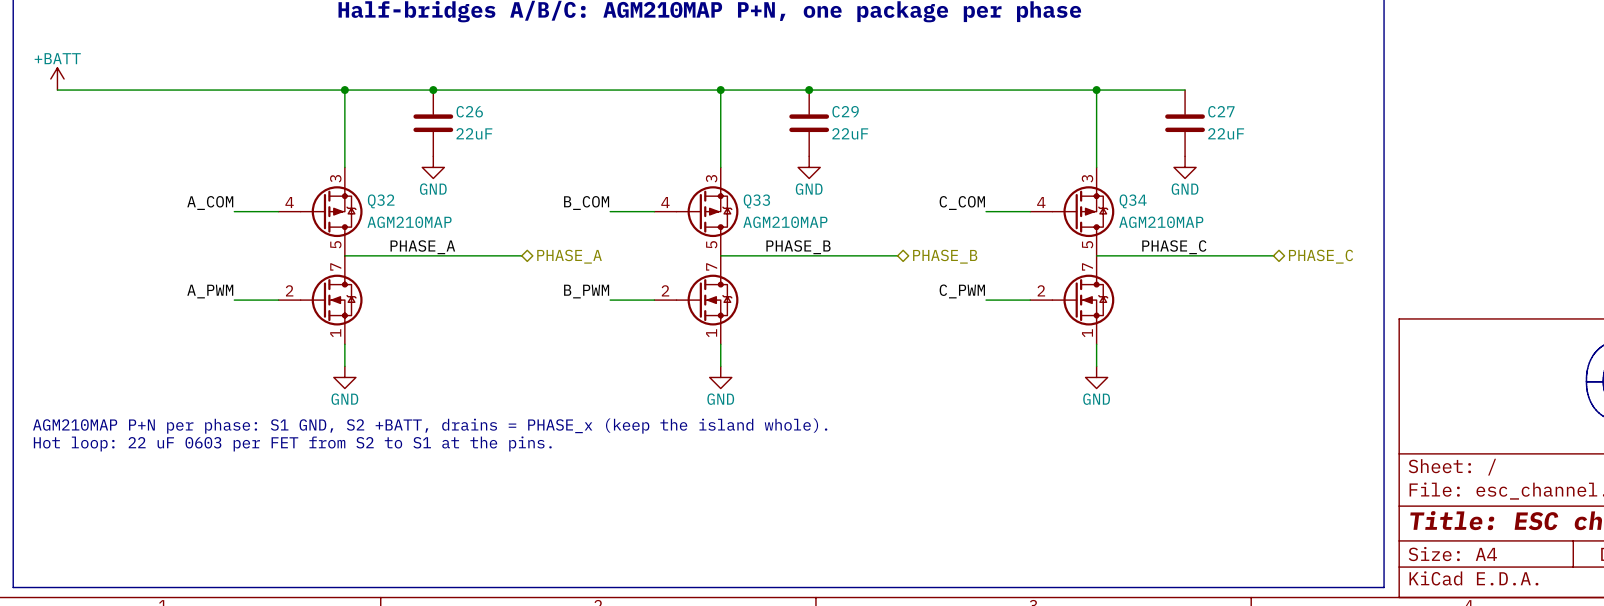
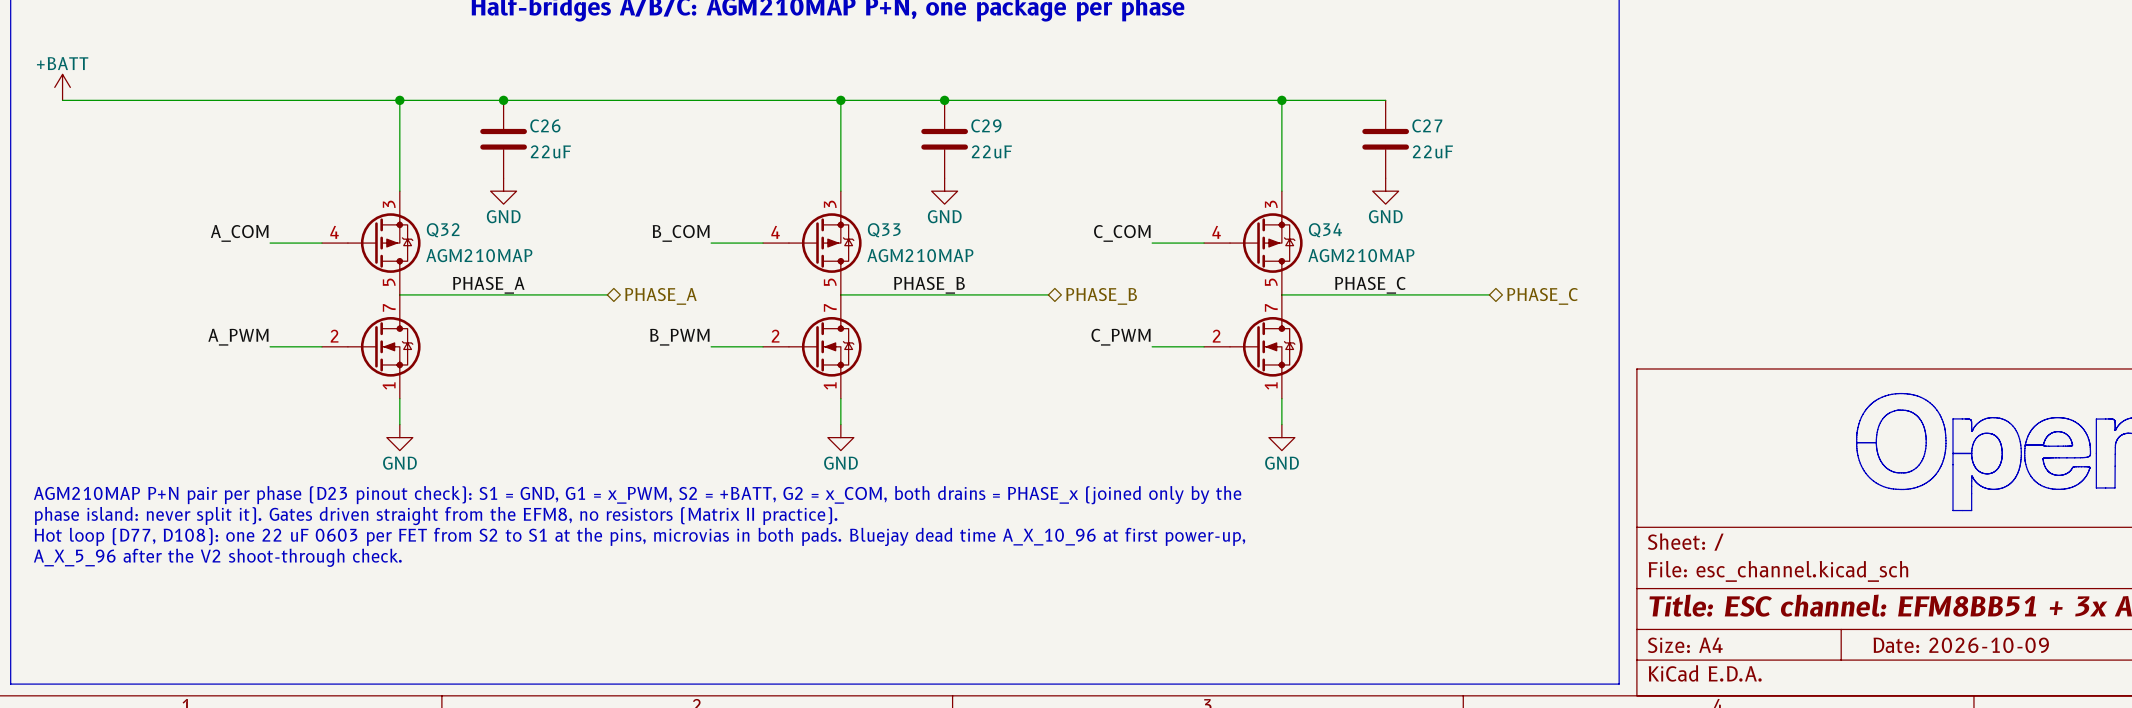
text: AGM210MAP P+N per phase: S1 GND, S2 +BATT, drains = PHASE_x (keep the island whole). (430, 426) -> AGM210MAP P+N pair per phase (D23 pinout check): S1 = GND, G1 = x_PWM, S2 = +BATT, G2 = x_COM, both drains = PHASE_x (joined only by the (637, 495)
text: Hot loop: 22 uF 0603 per FET from S2 to S1 at the pins. (292, 443) -> phase island: never split it). Gates driven straight from the EFM8, no resistors (Matrix II practice). (436, 516)
text: none -> Hot loop (D77, D108): one 22 uF 0603 per FET from S2 to S1 at the pins, microvias in both pads. Bluejay dead time A_X_10_96 at first power-up, (639, 536)
text: none -> A_X_5_96 after the V2 shoot-through check. (217, 557)

